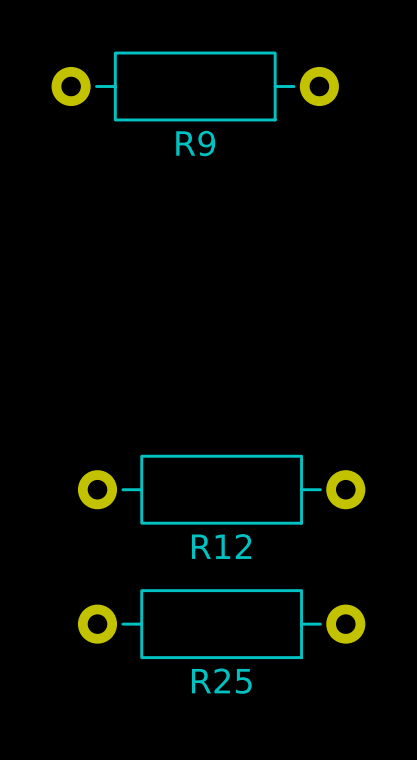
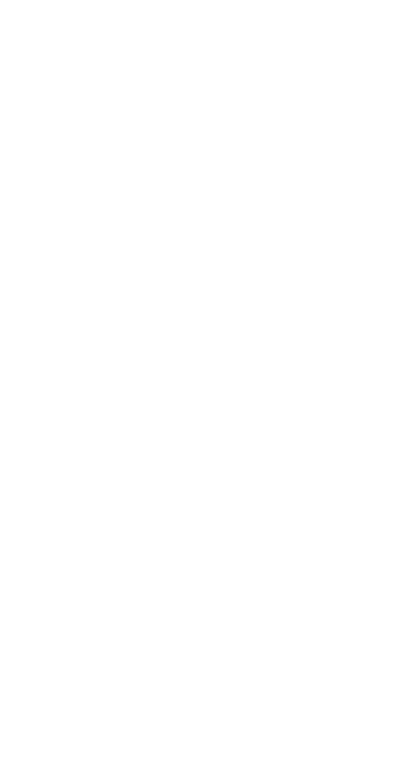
R9: (195, 86) -> none
R12: (221, 489) -> none
R25: (221, 624) -> none

